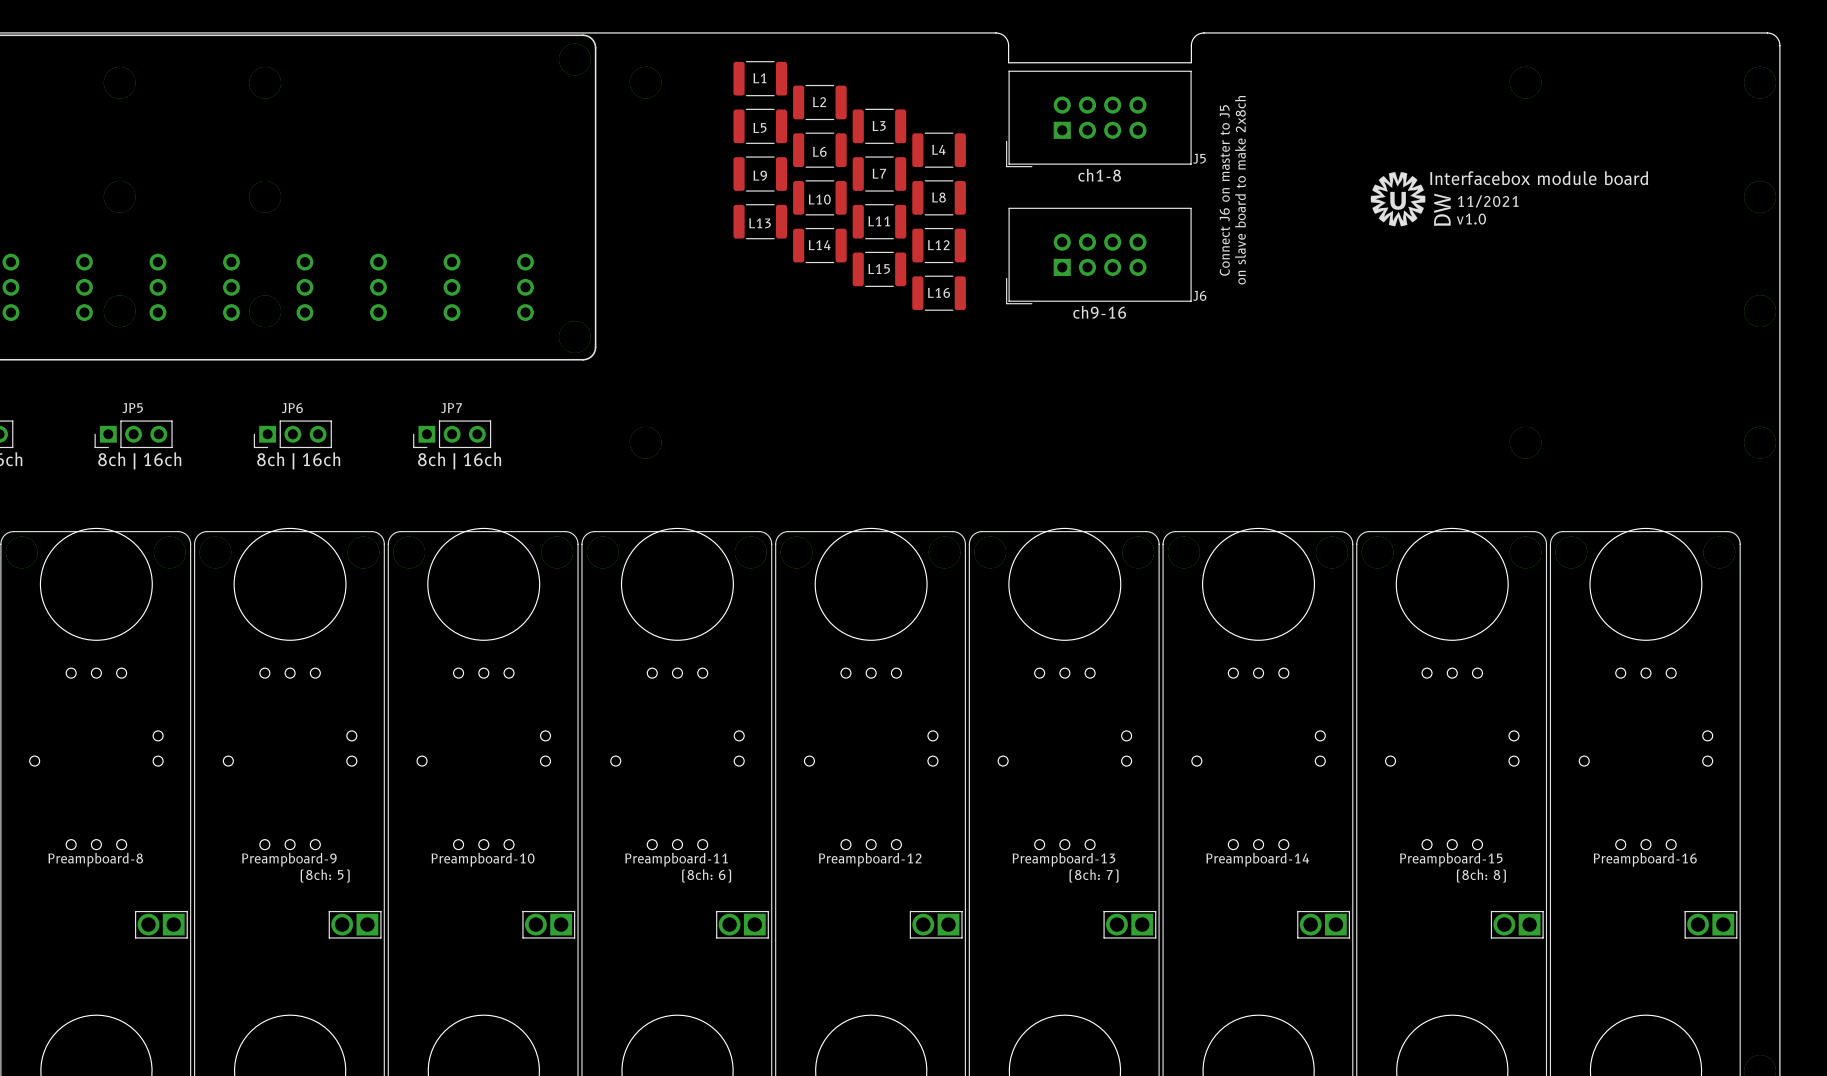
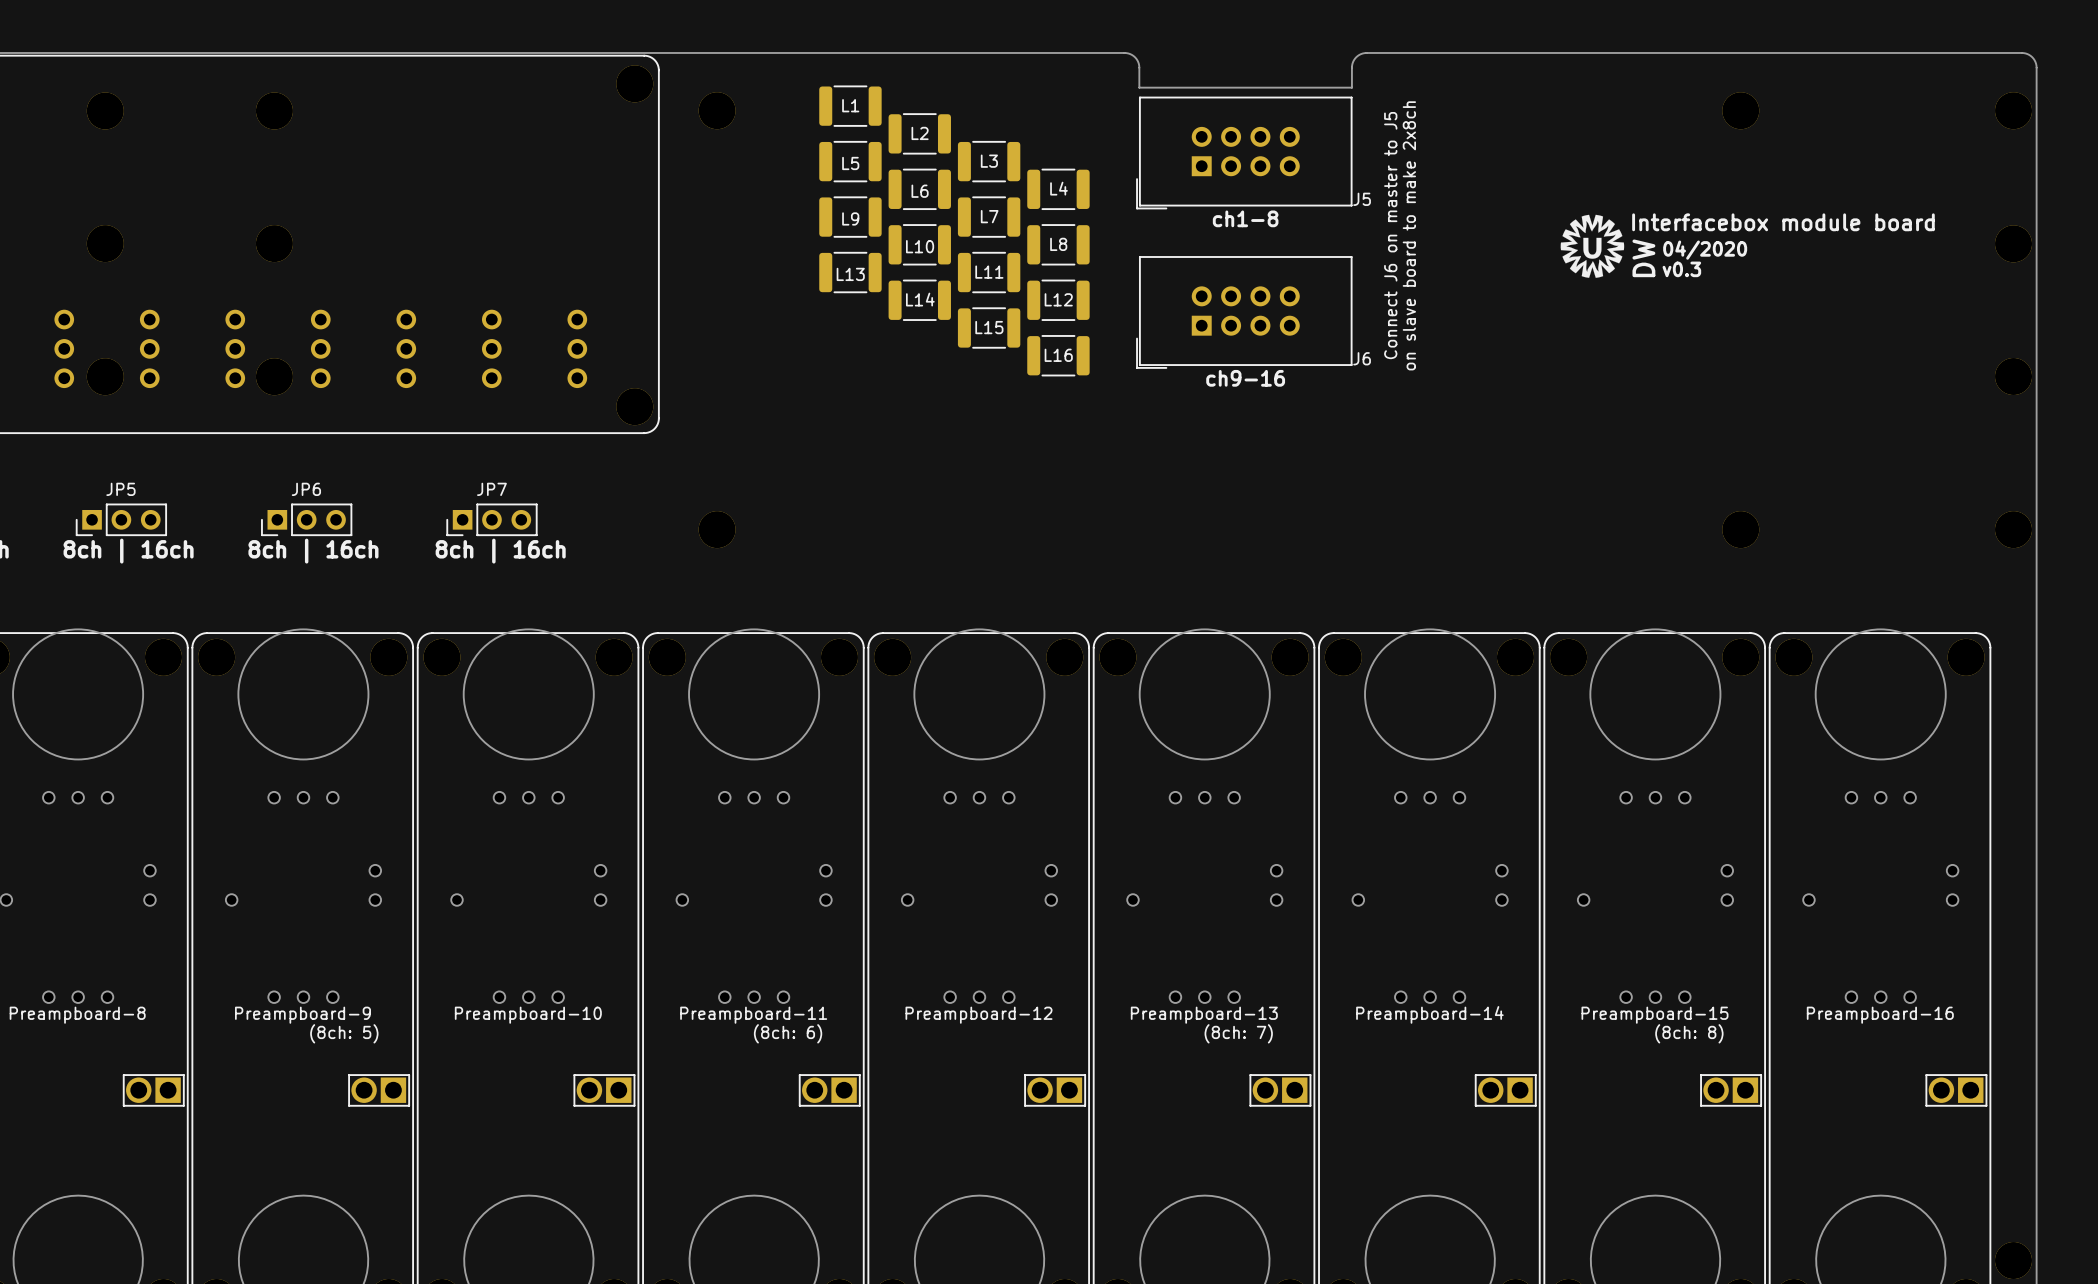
text: 11/2021 (1488, 201) -> 04/2020 (1705, 250)
text: v1.0 (1471, 219) -> v0.3 (1681, 269)

